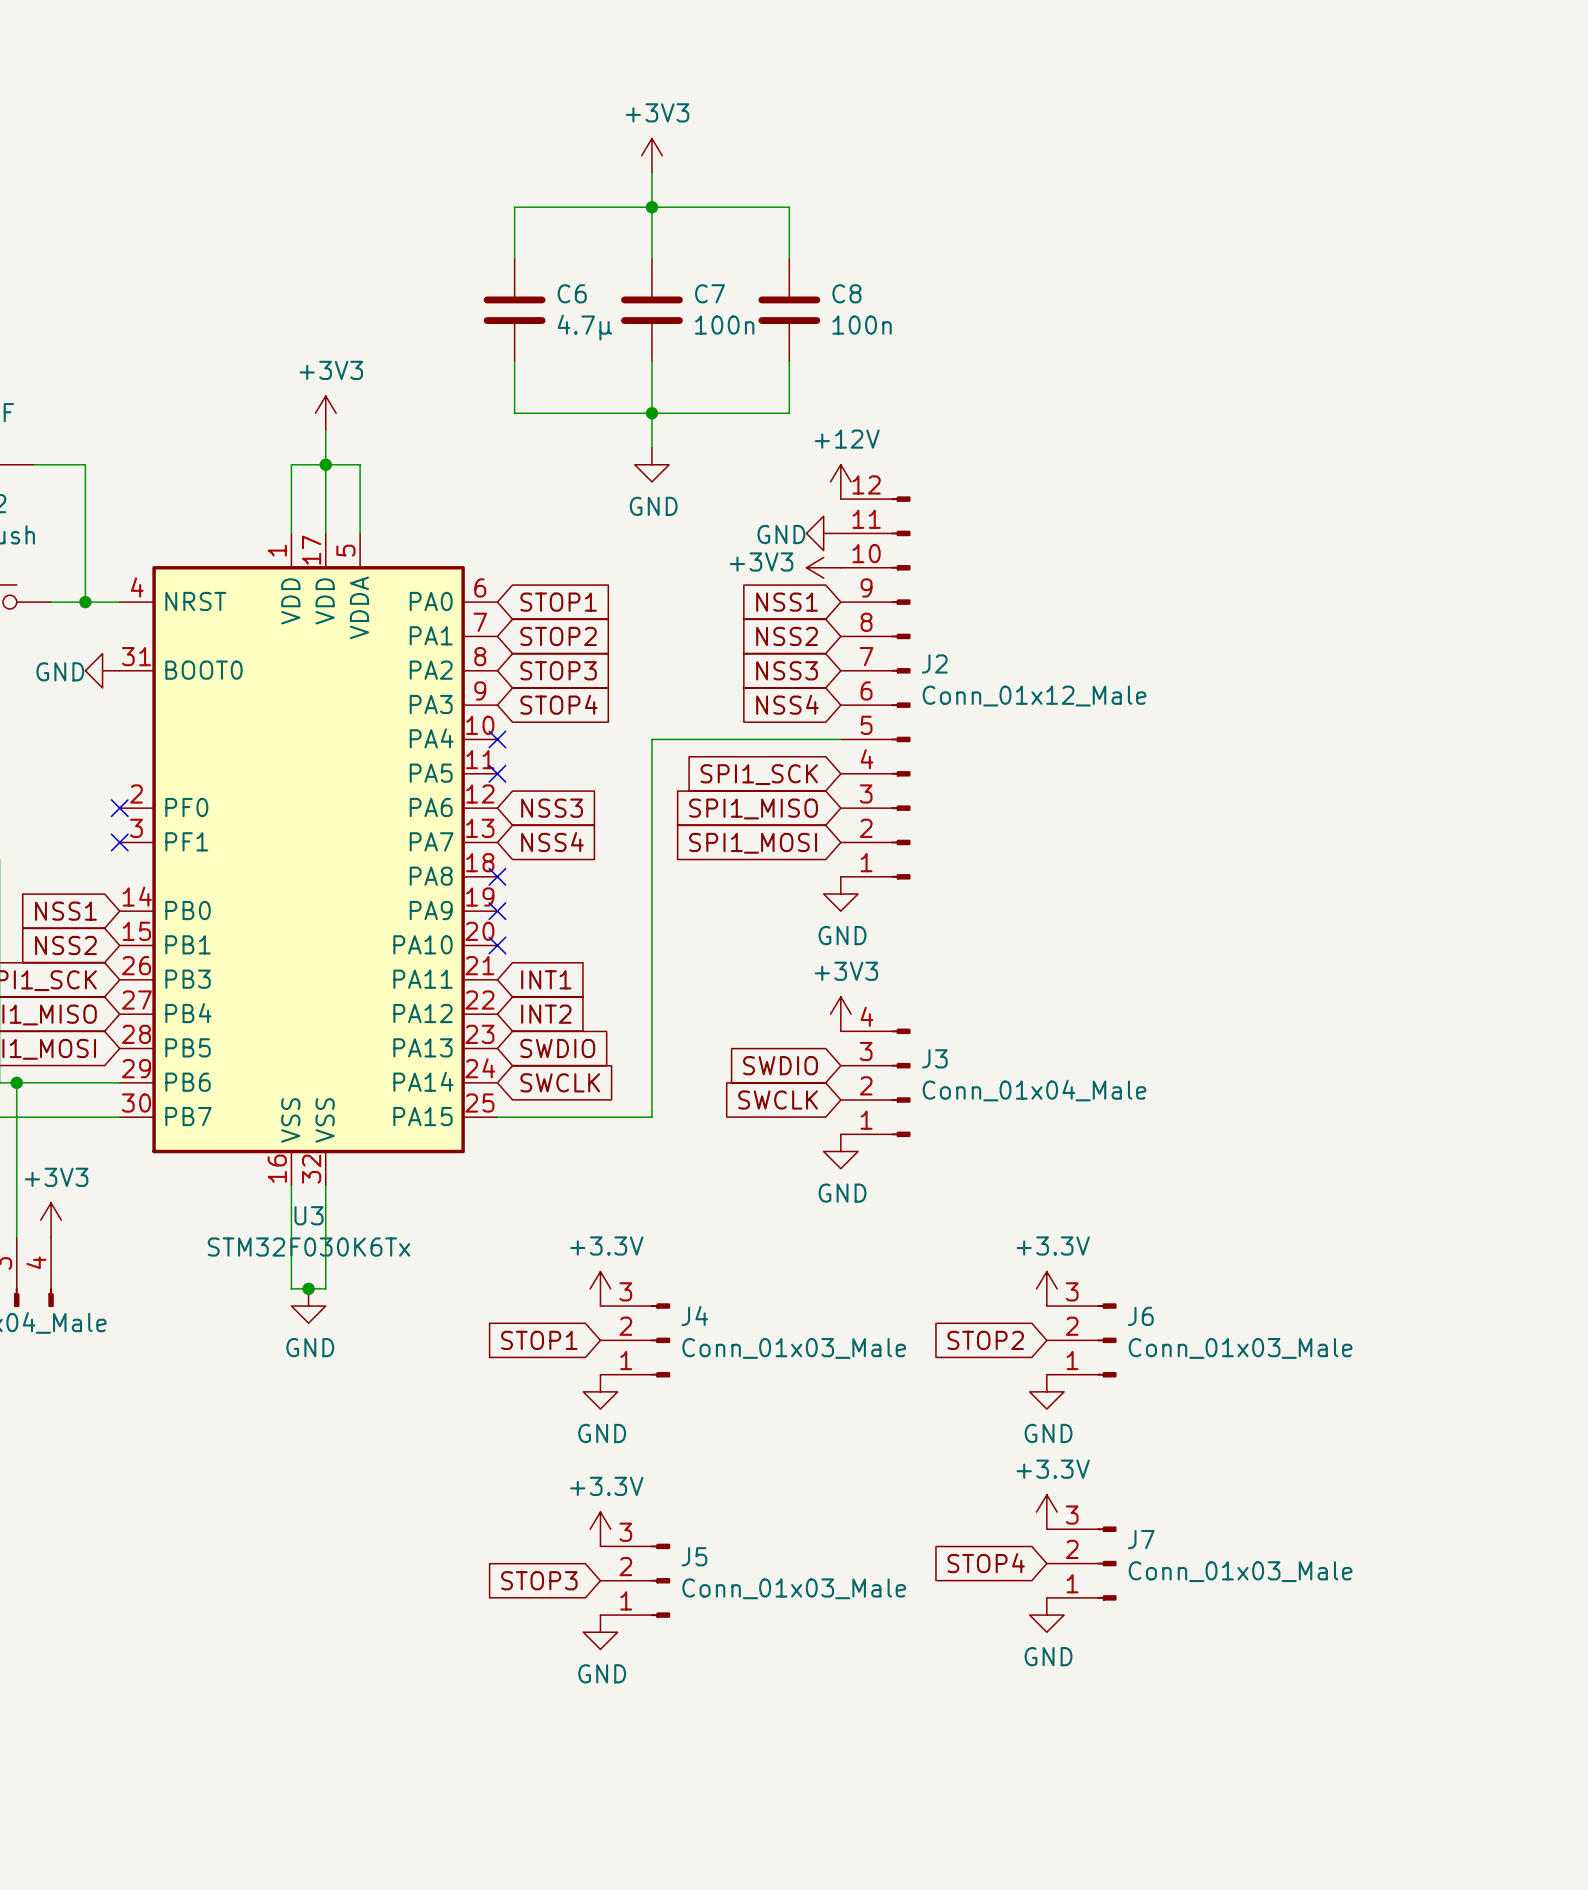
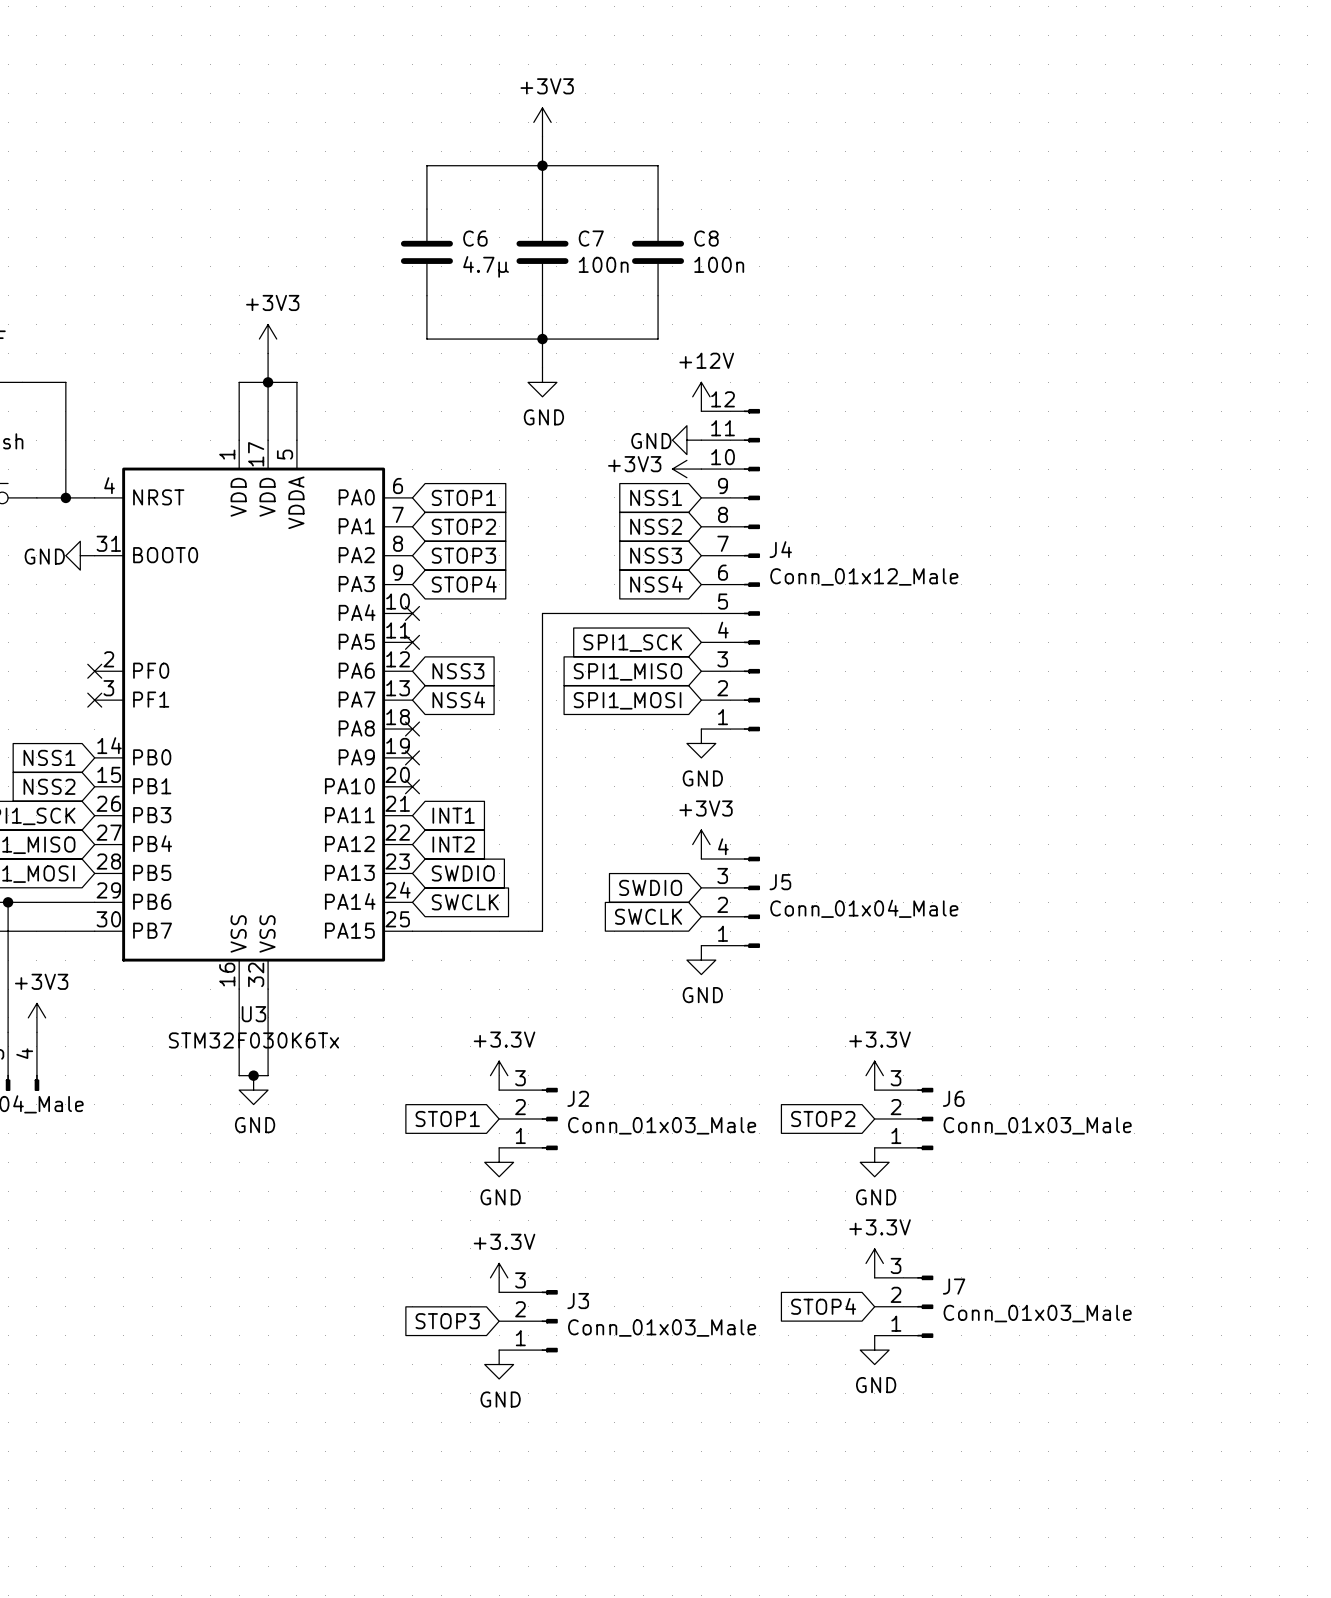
J2 name: J2 (934, 663) -> J4 (780, 549)
J3 name: J3 (934, 1058) -> J5 (780, 882)
J4 name: J4 (694, 1315) -> J2 (578, 1098)
J5 name: J5 (694, 1556) -> J3 (578, 1301)

